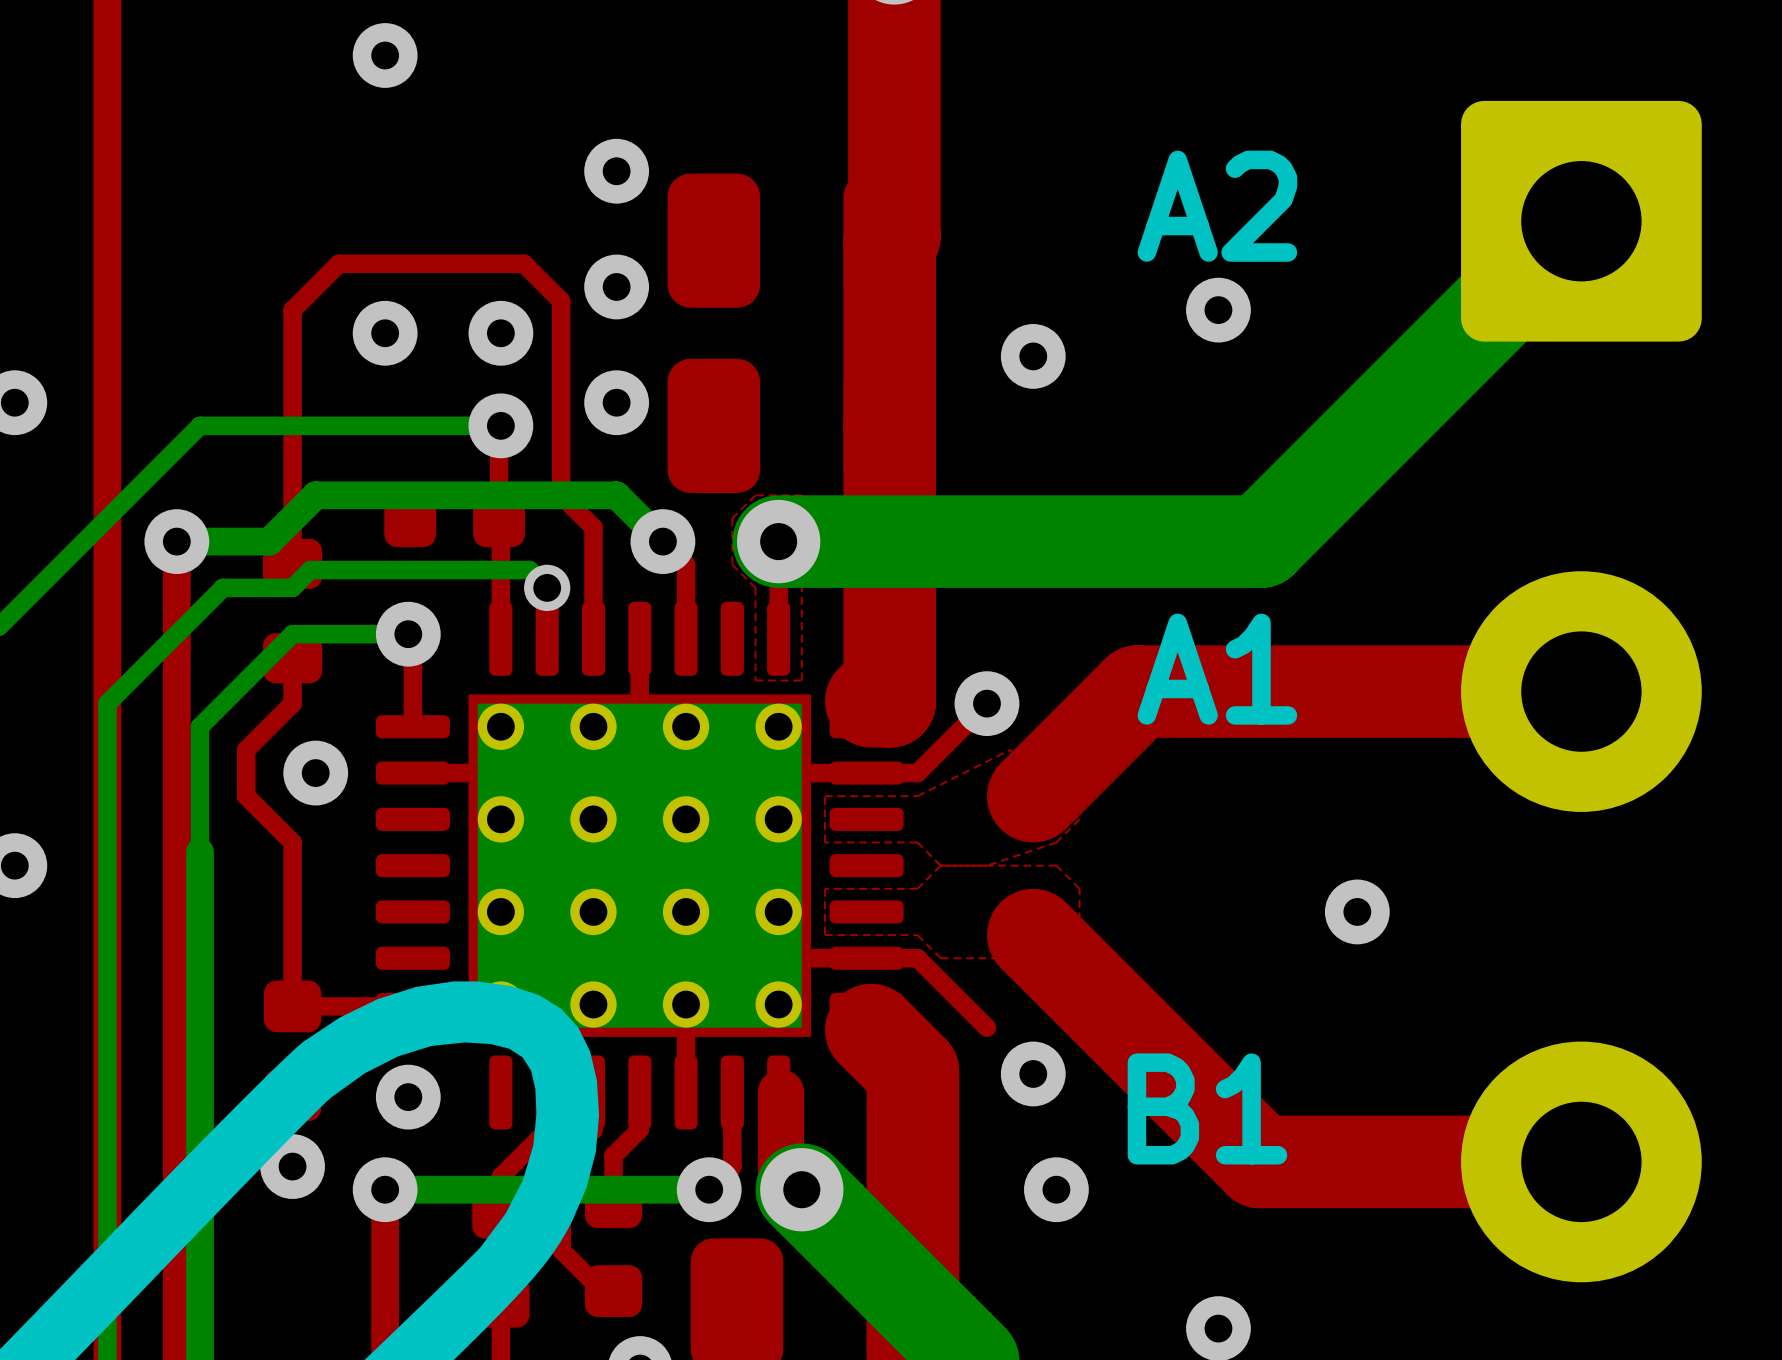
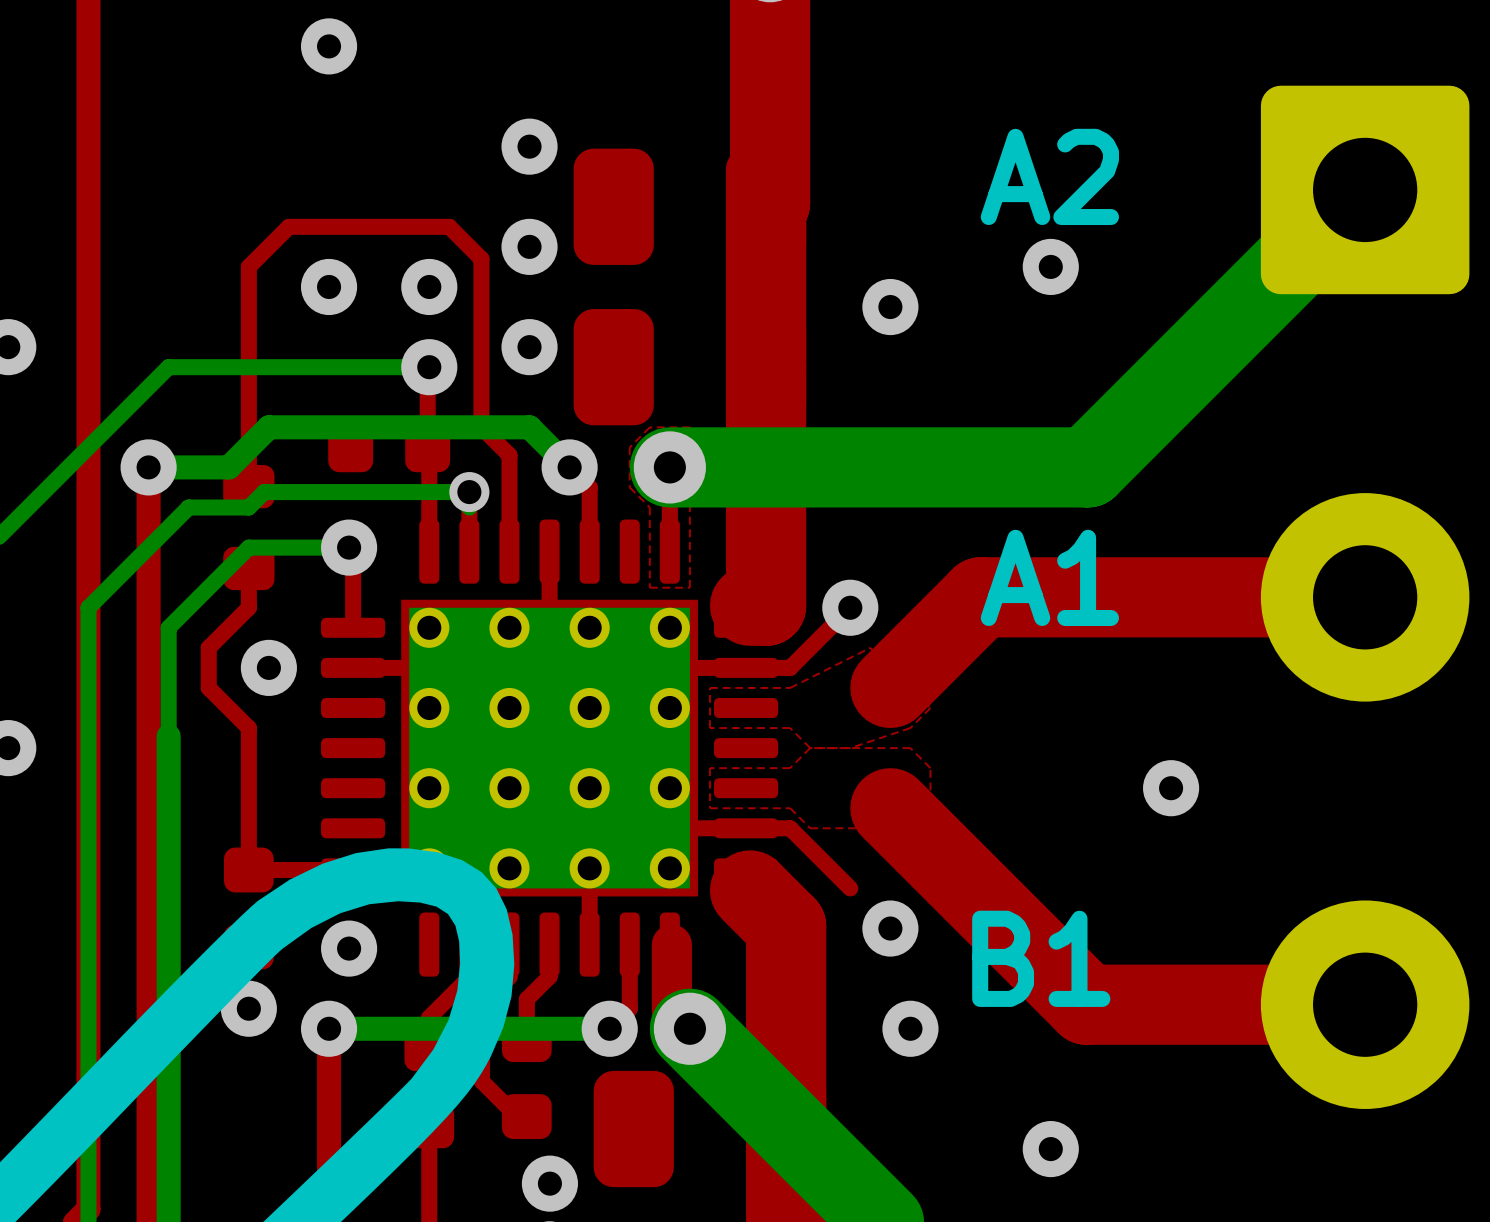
via position: (547, 587) -> (469, 492)

